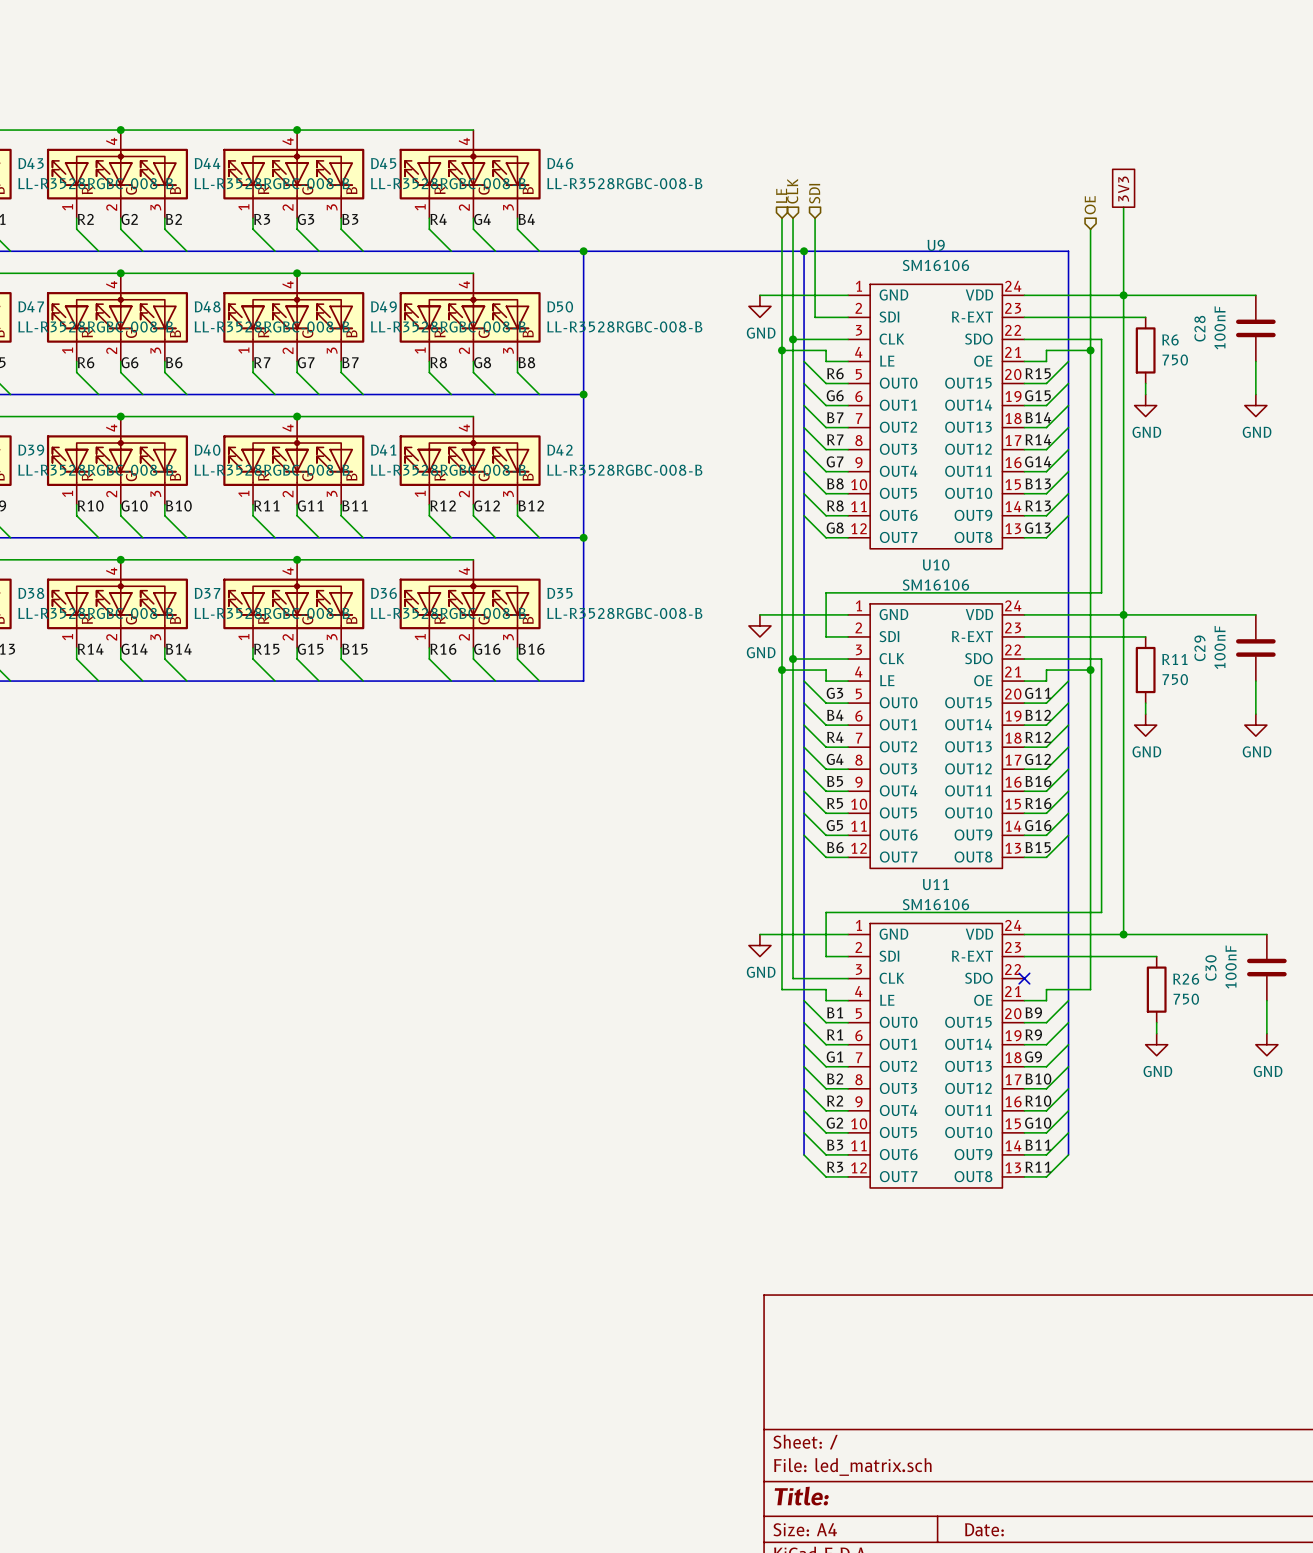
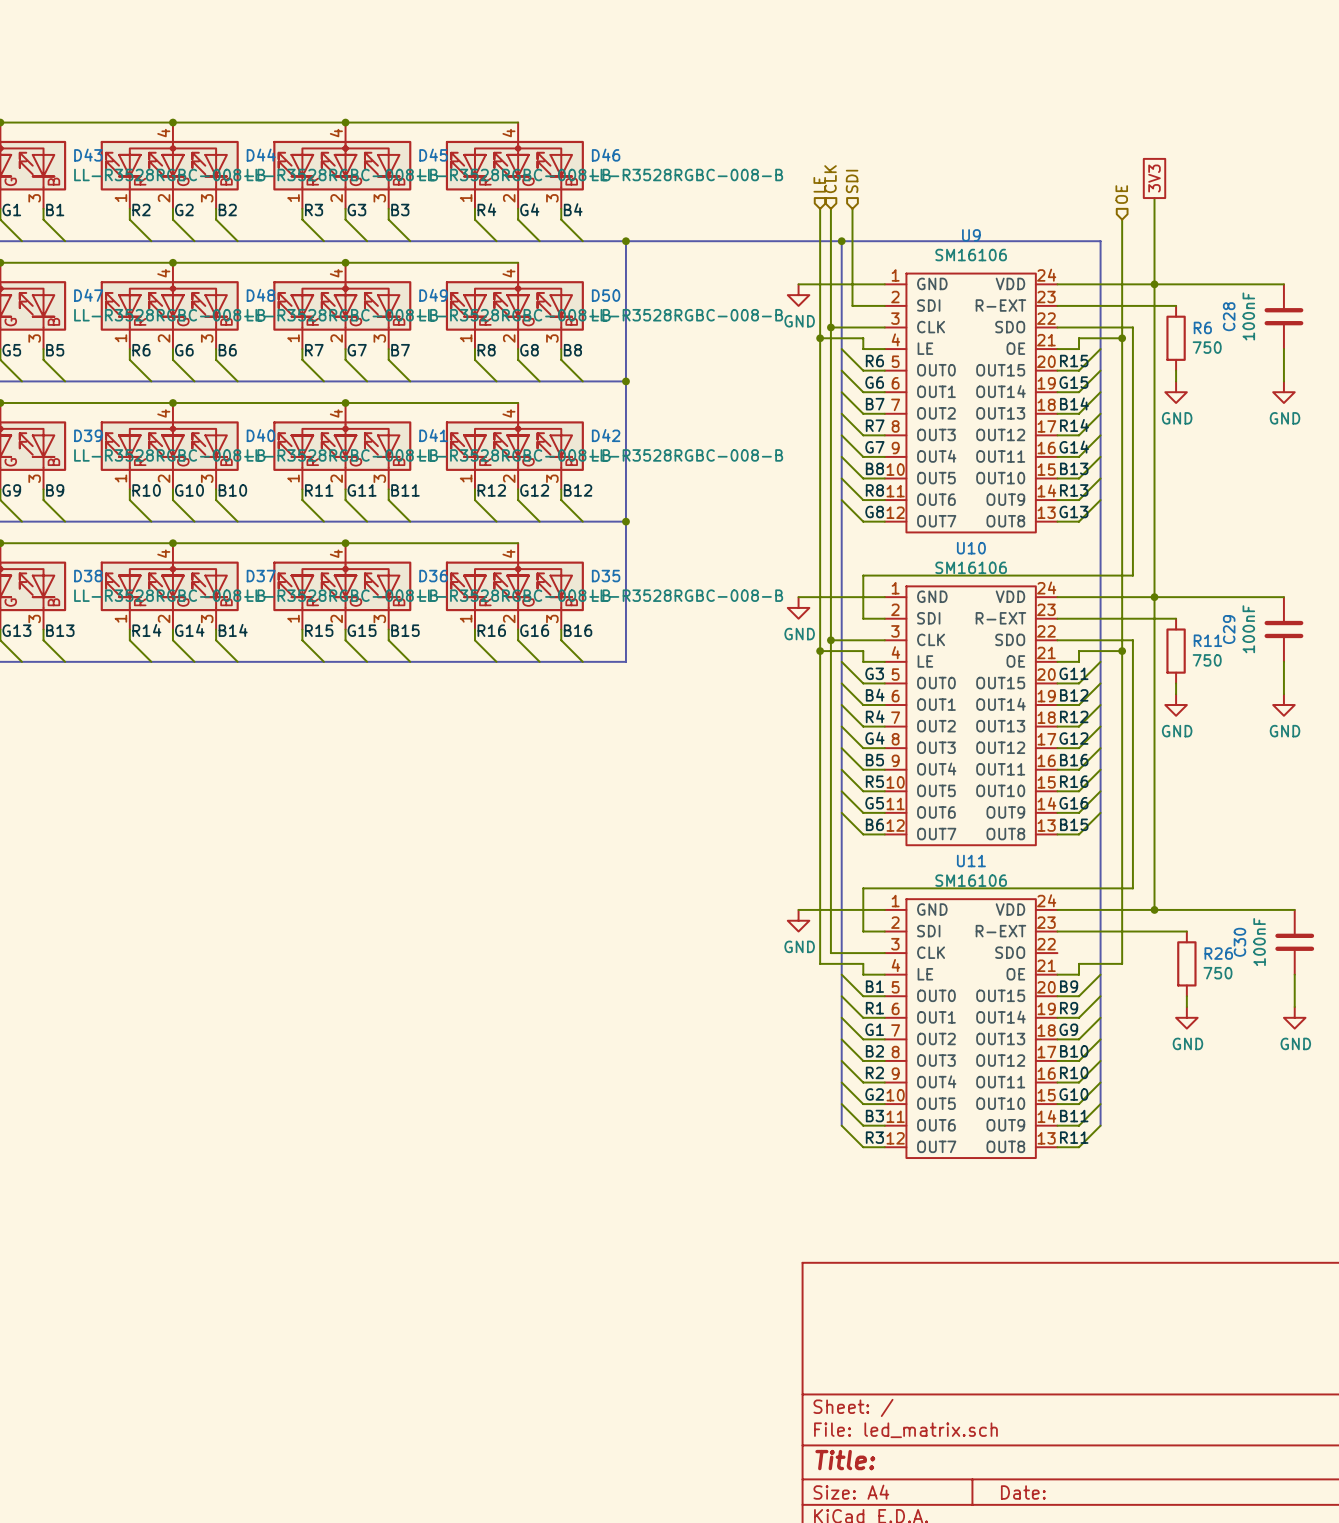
no-connect mark: (1024, 978) -> none

